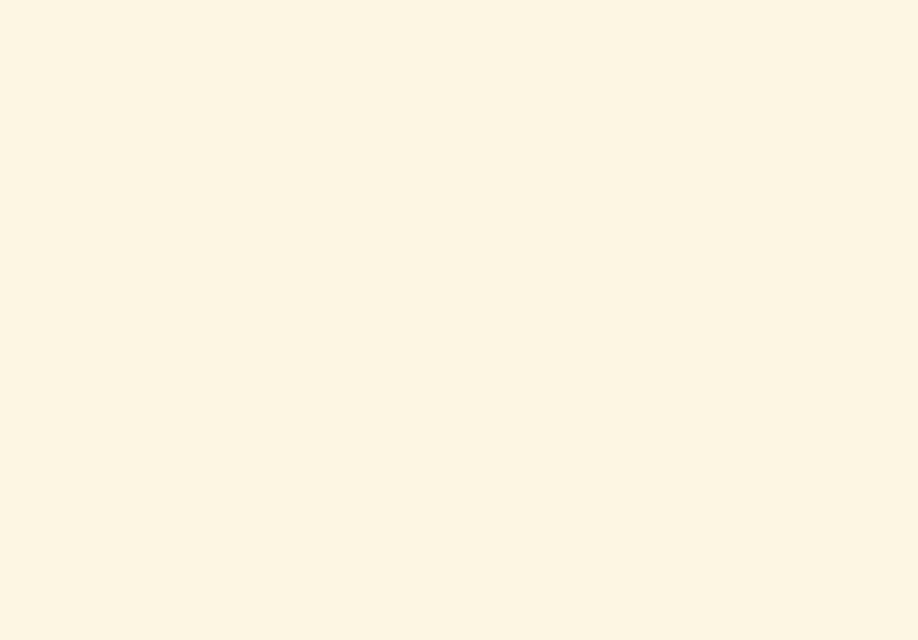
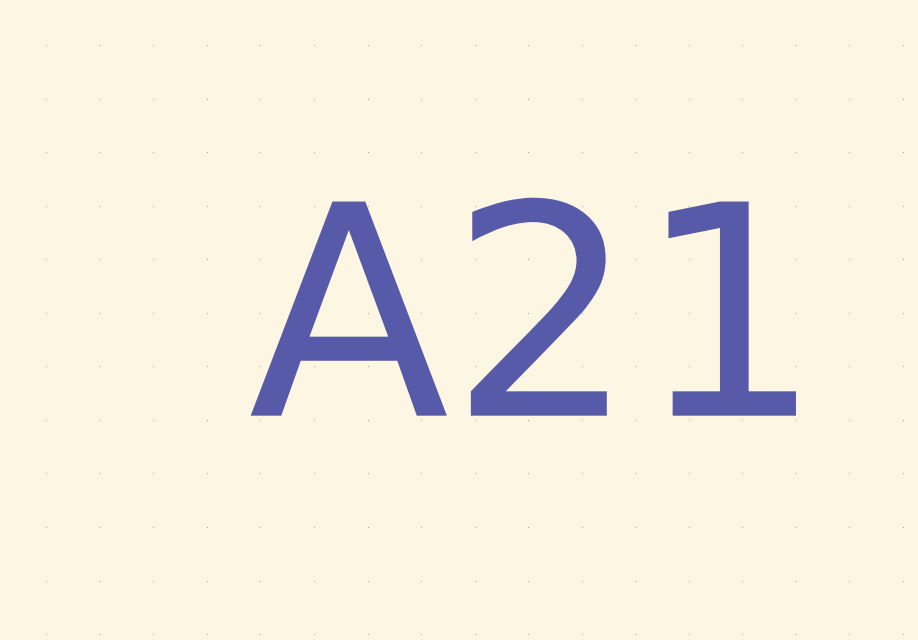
text: none -> A21 (523, 306)

